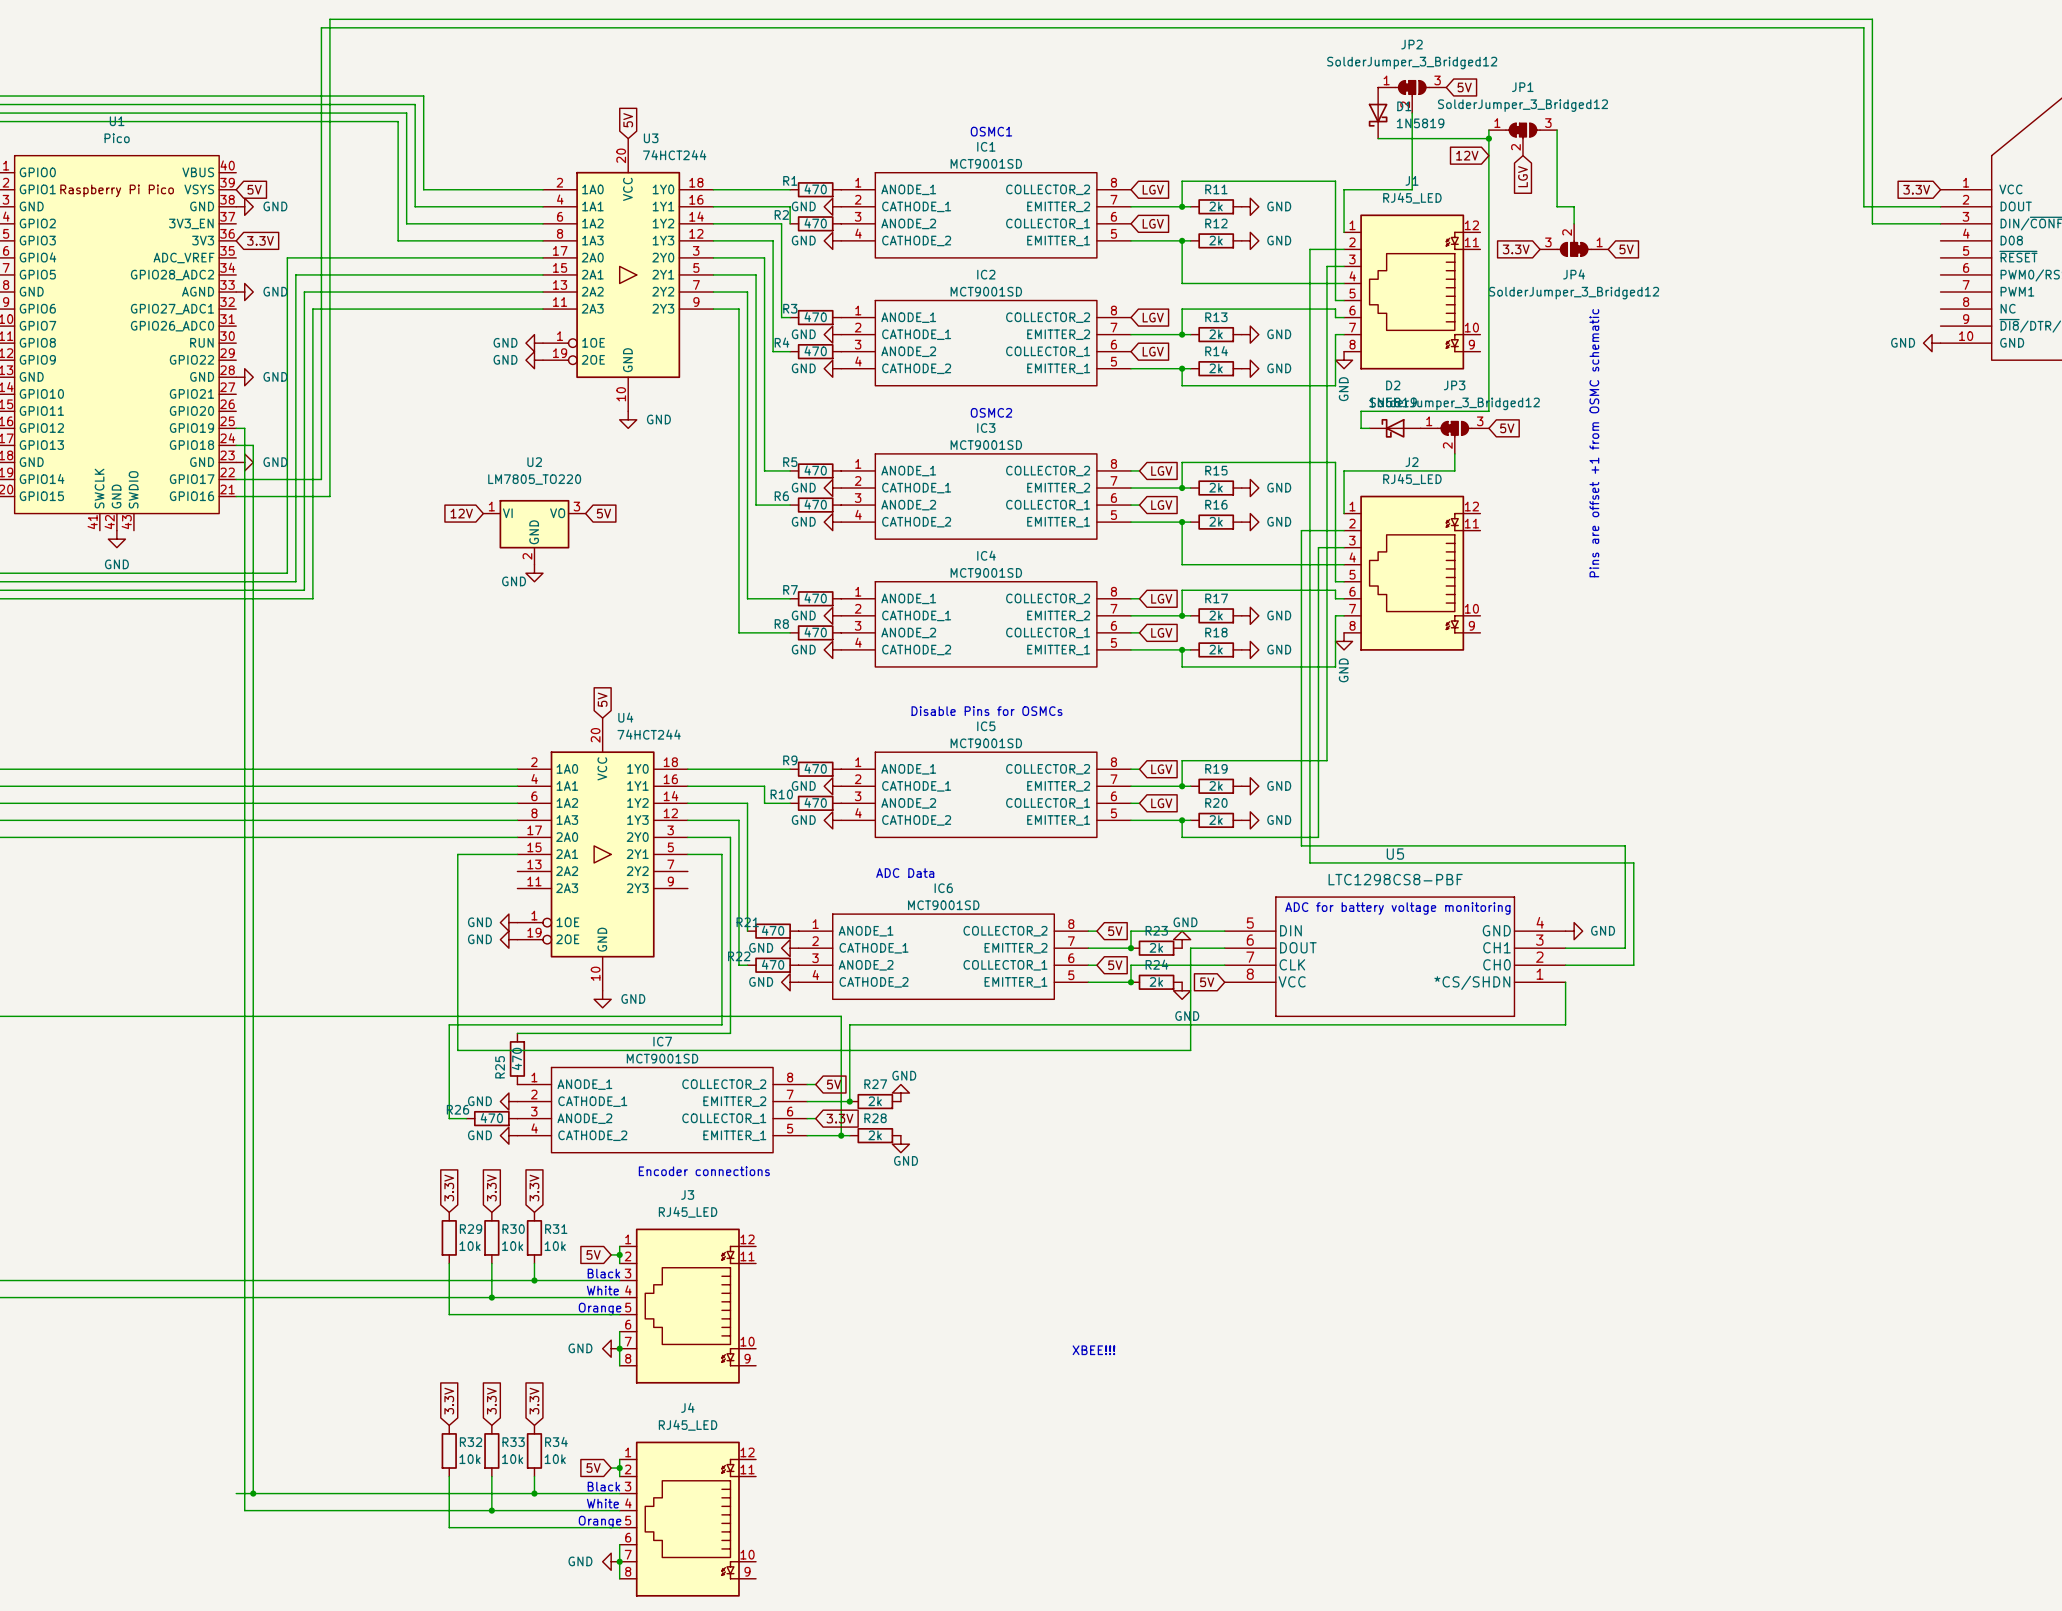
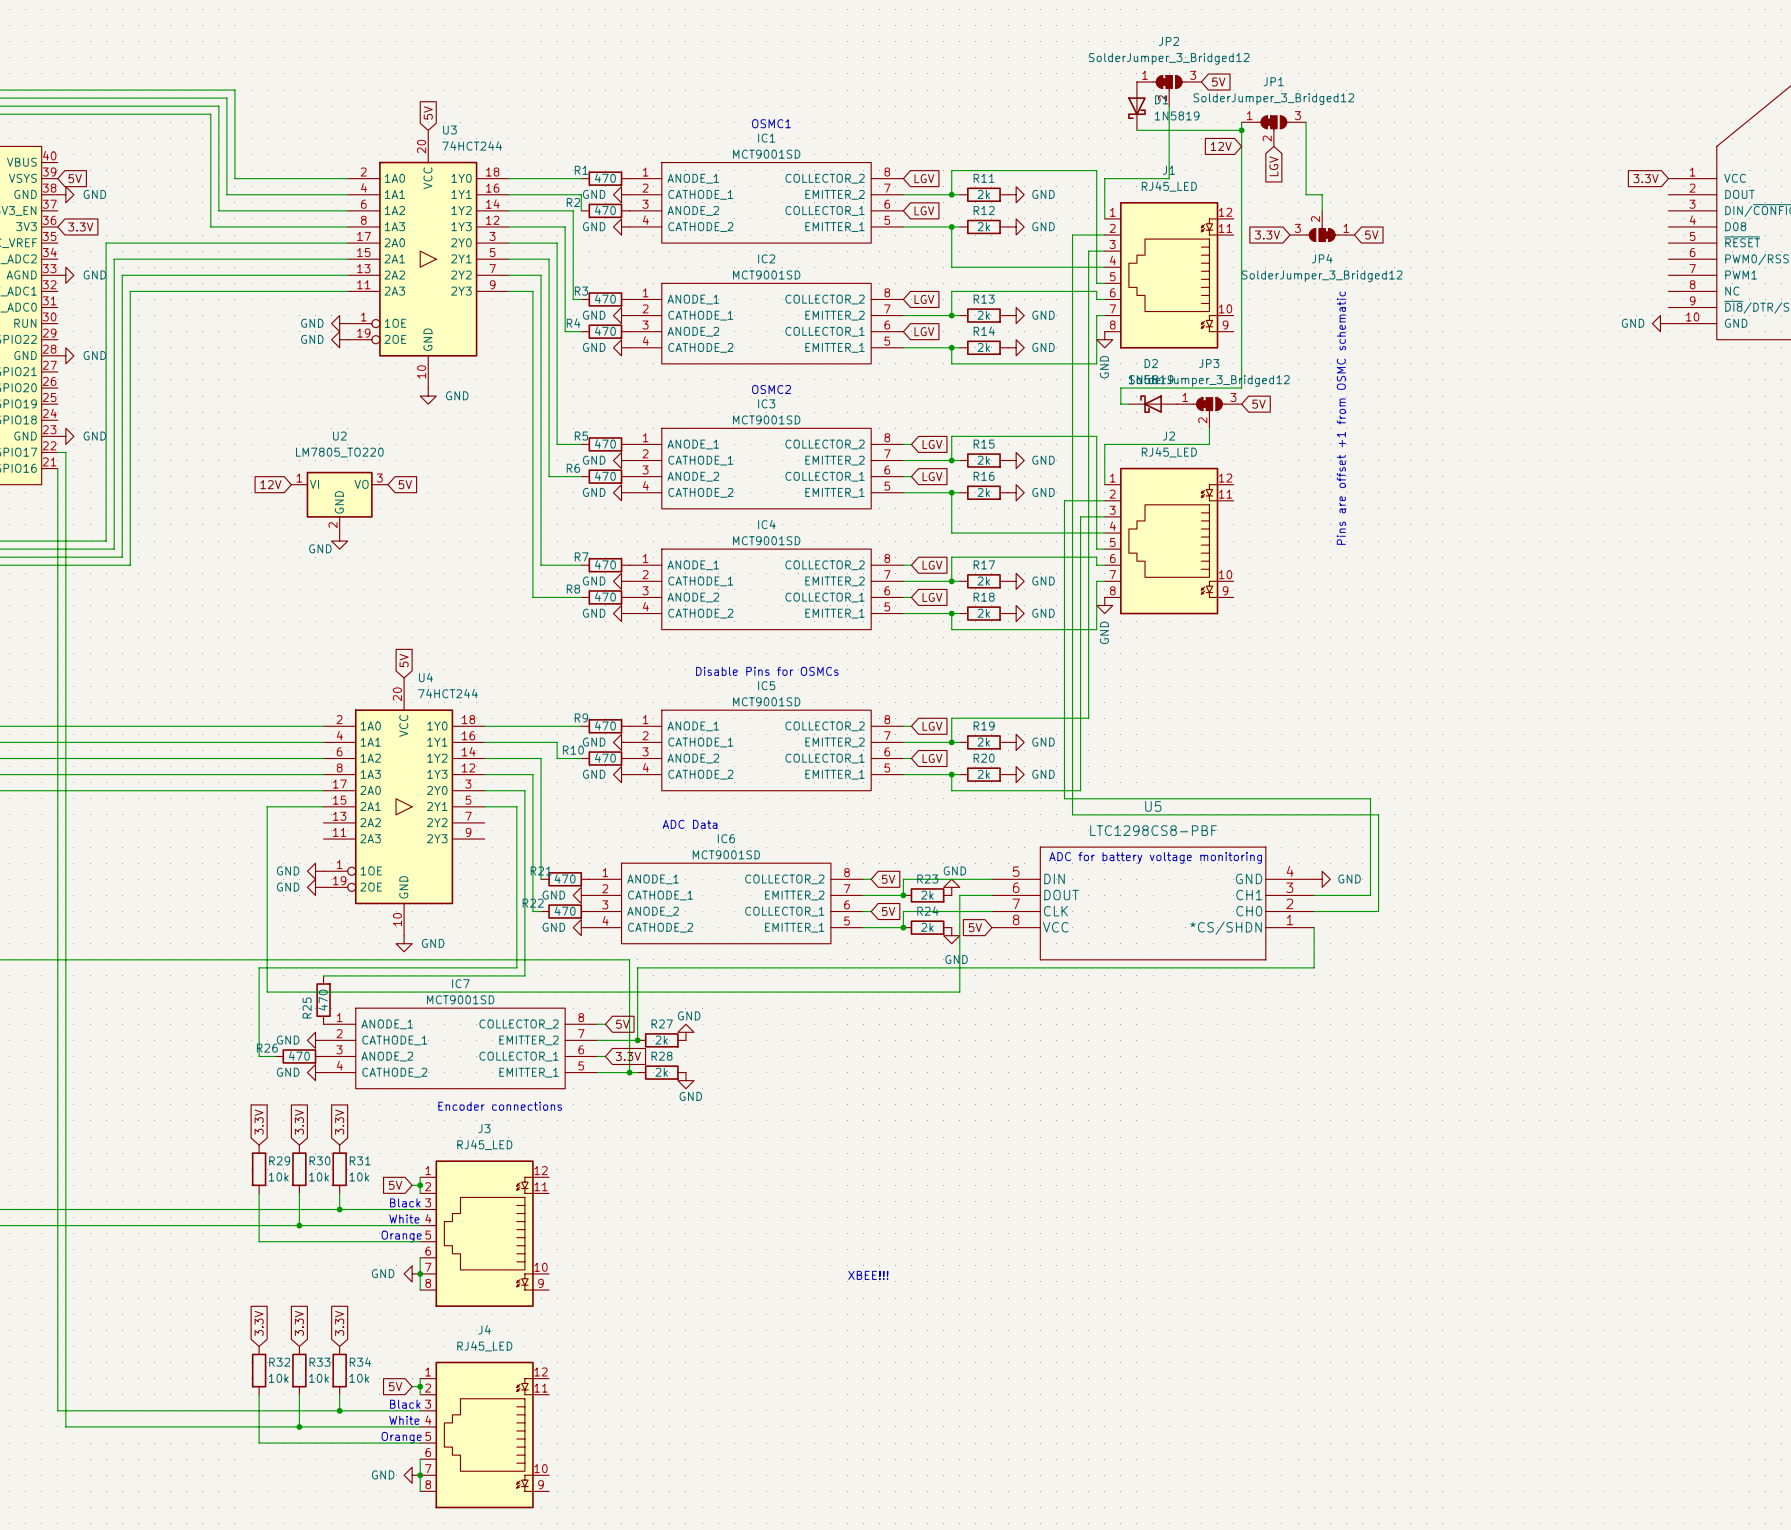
wire: (1940, 206) (1863, 206) (1863, 27) (321, 27) (321, 479) (244, 479) (244, 428) (236, 428) -> none
wire: (1940, 223) (1872, 223) (1872, 19) (329, 19) (329, 496) (236, 496) -> (57, 1410) (57, 468)
wire: (236, 445) (253, 445) (253, 1493) -> none
junction: (253, 1493) -> none

